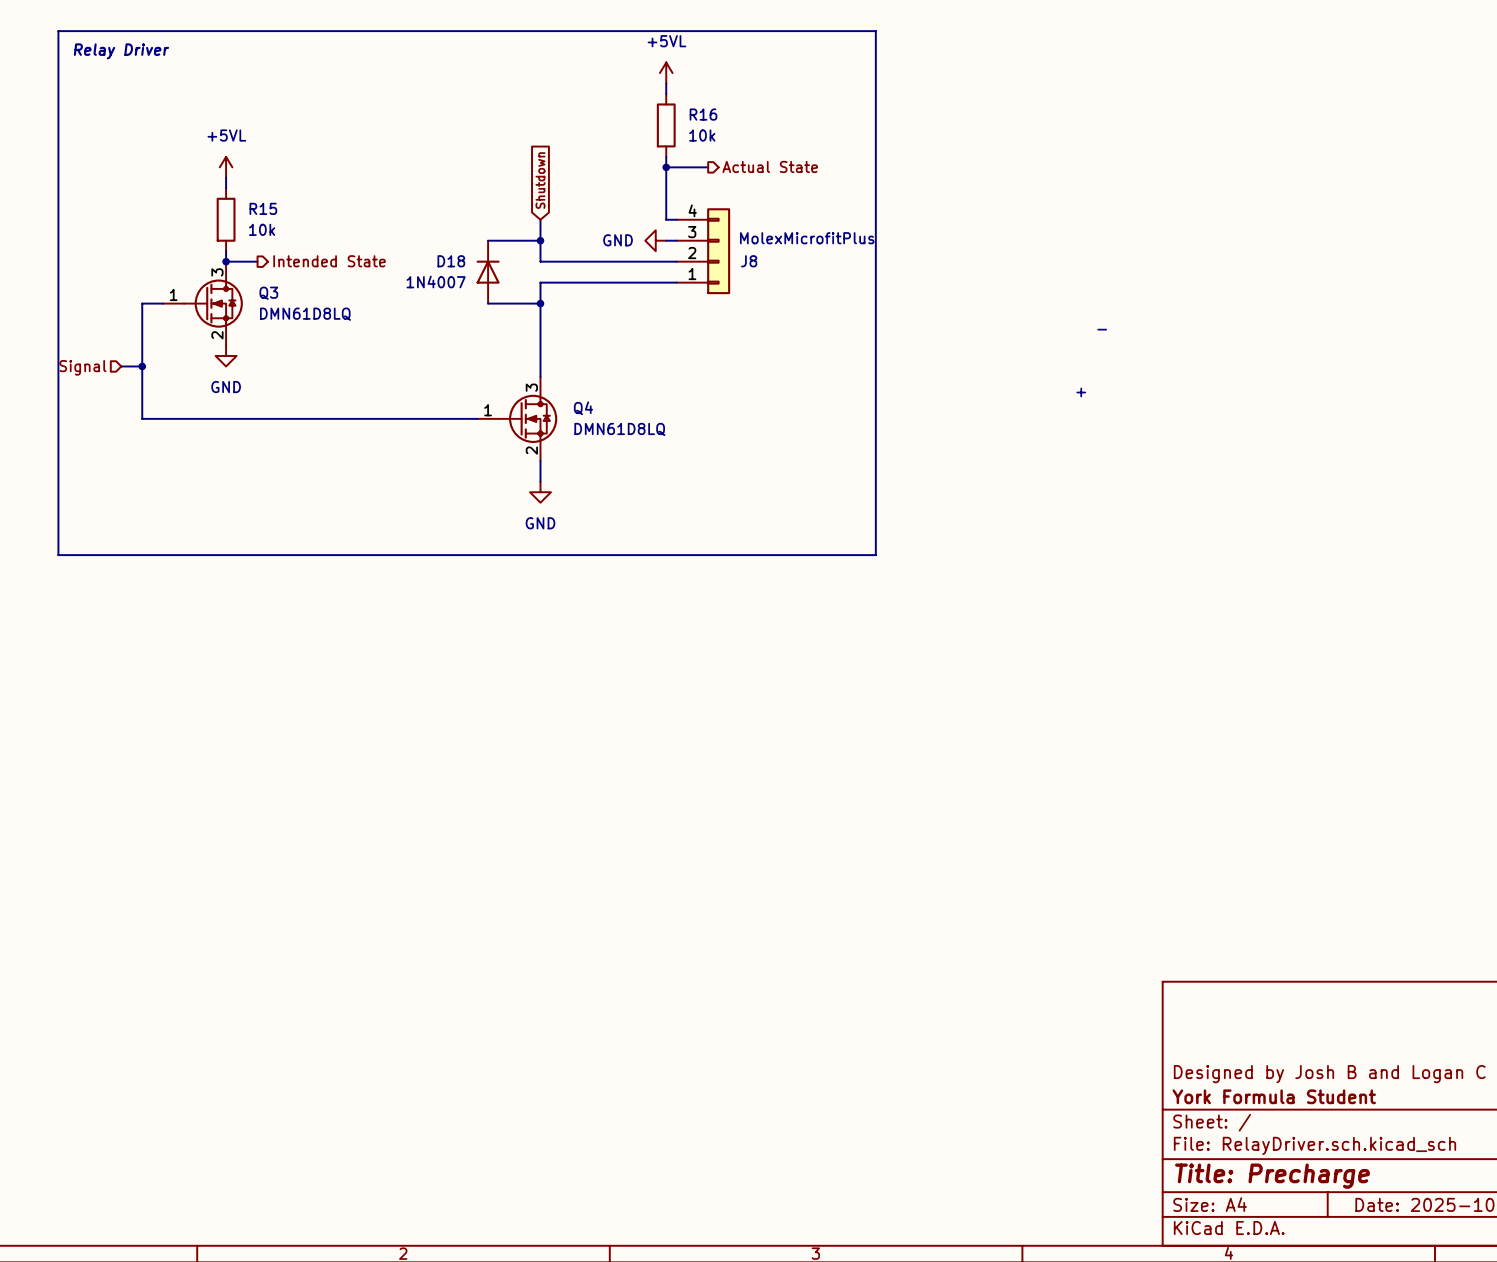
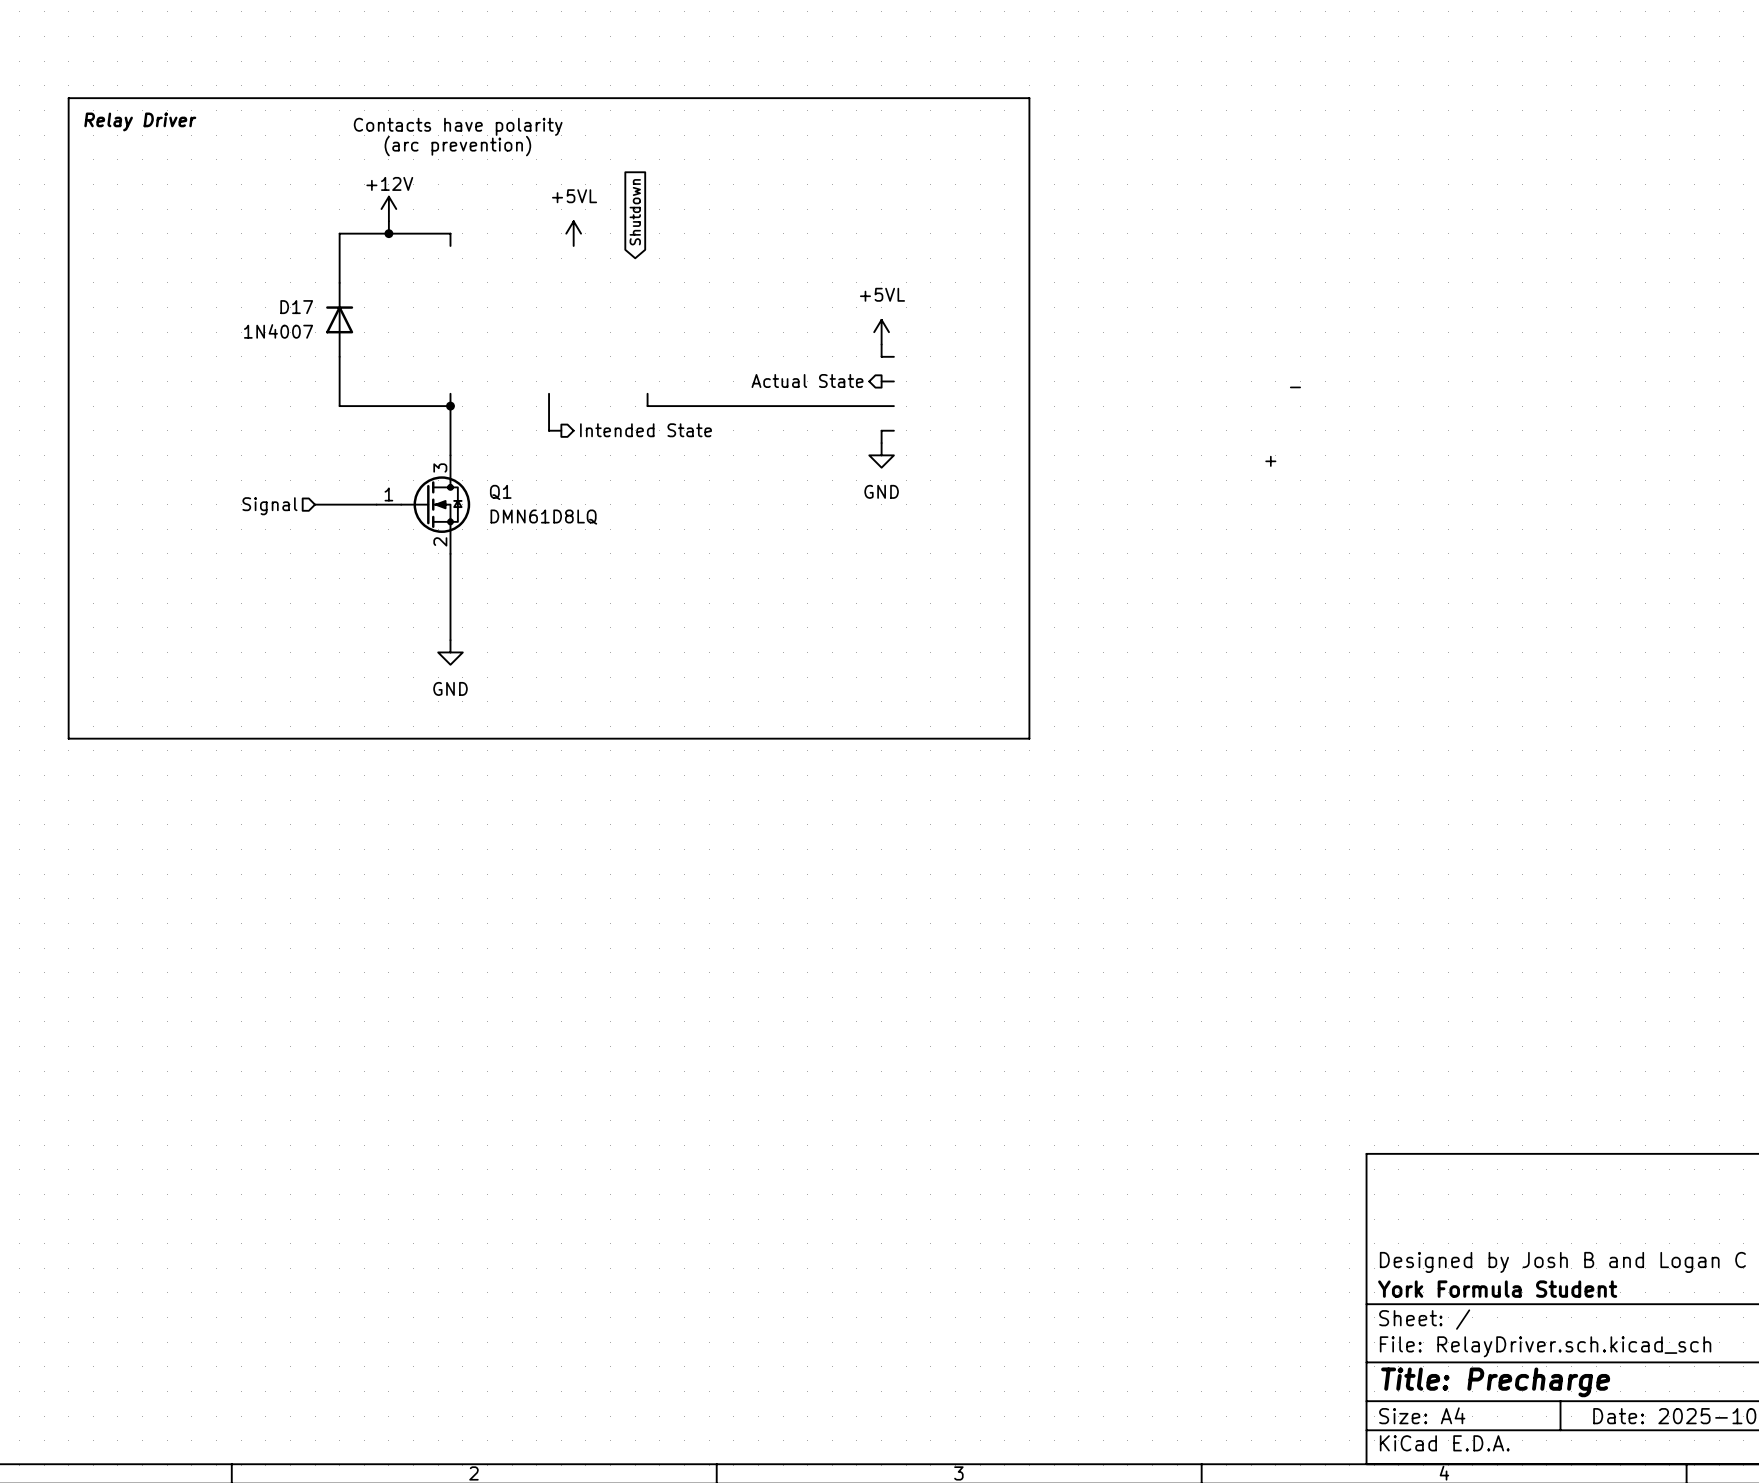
text position: Relay Driver (121, 51) -> Relay Driver (140, 121)
power symbol: +5VL (666, 73) -> none
line: (58, 83) (58, 31) (875, 31) (875, 83) -> (68, 98) (1029, 98)
wire: (666, 83) (666, 93) -> none
text: none -> Contacts have polarity (458, 126)
text: none -> (arc prevention) (457, 146)
R16: 10k (666, 125) -> none
wire: (666, 156) (666, 219) (676, 219) -> none
hierarchical label rotation: 0° (770, 166) -> 180° (807, 381)
hierarchical label position: Actual State (770, 166) -> Actual State (807, 381)
power symbol: +5VL (226, 167) -> none
wire: (666, 167) (708, 167) -> none
junction: (666, 167) -> none
wire: (226, 177) (226, 188) -> (388, 221) (388, 233)
power symbol: none -> +12V (388, 209)
junction: none -> (388, 233)
power symbol: none -> +5VL (573, 233)
wire: none -> (450, 245) (450, 233) (339, 233) (339, 282)
R15: 10k (226, 219) -> none
wire: (540, 219) (540, 261) (676, 261) -> none
wire: (488, 240) (540, 240) -> none
junction: (540, 240) -> none
power symbol: GND (655, 240) -> none
wire: (666, 240) (676, 240) -> (881, 381) (893, 381)
wire: (226, 251) (226, 261) (257, 261) -> none
J8: MolexMicrofitPlus (703, 251) -> none
junction: (226, 261) -> none
hierarchical label: Intended State (329, 261) -> none
D17: none -> 1N4007 (339, 319)
D18: 1N4007 (488, 272) -> none
wire: (676, 282) (540, 282) (540, 376) -> none
power symbol: none -> +5VL (881, 332)
wire: none -> (881, 344) (881, 356) (893, 356)
wire: (163, 303) (142, 303) (142, 418) (477, 418) -> none
Q3: DMN61D8LQ (203, 303) -> none
wire: none -> (339, 356) (339, 406) (450, 406)
wire: (488, 303) (540, 303) -> none
junction: (540, 303) -> none
wire: none -> (450, 393) (450, 455)
wire: none -> (549, 393) (549, 430) (561, 430)
wire: none -> (647, 393) (647, 406) (893, 406)
junction: none -> (450, 406)
power symbol: GND (226, 355) -> none
wire: (121, 366) (142, 366) -> none
junction: (142, 366) -> none
hierarchical label: none -> Intended State (646, 430)
wire: none -> (893, 430) (881, 430) (881, 443)
hierarchical label position: Signal (82, 367) -> Signal (269, 506)
power symbol: none -> GND (881, 455)
Q4: DMN61D8LQ (517, 418) -> none
wire: none -> (315, 504) (376, 504)
Q1: none -> DMN61D8LQ (423, 504)
wire: (540, 460) (540, 481) -> none
wire: none -> (450, 553) (450, 640)
power symbol: GND (540, 492) -> none
line: (58, 555) (875, 555) -> (68, 652) (68, 738) (1029, 738) (1029, 652)
power symbol: none -> GND (450, 652)

